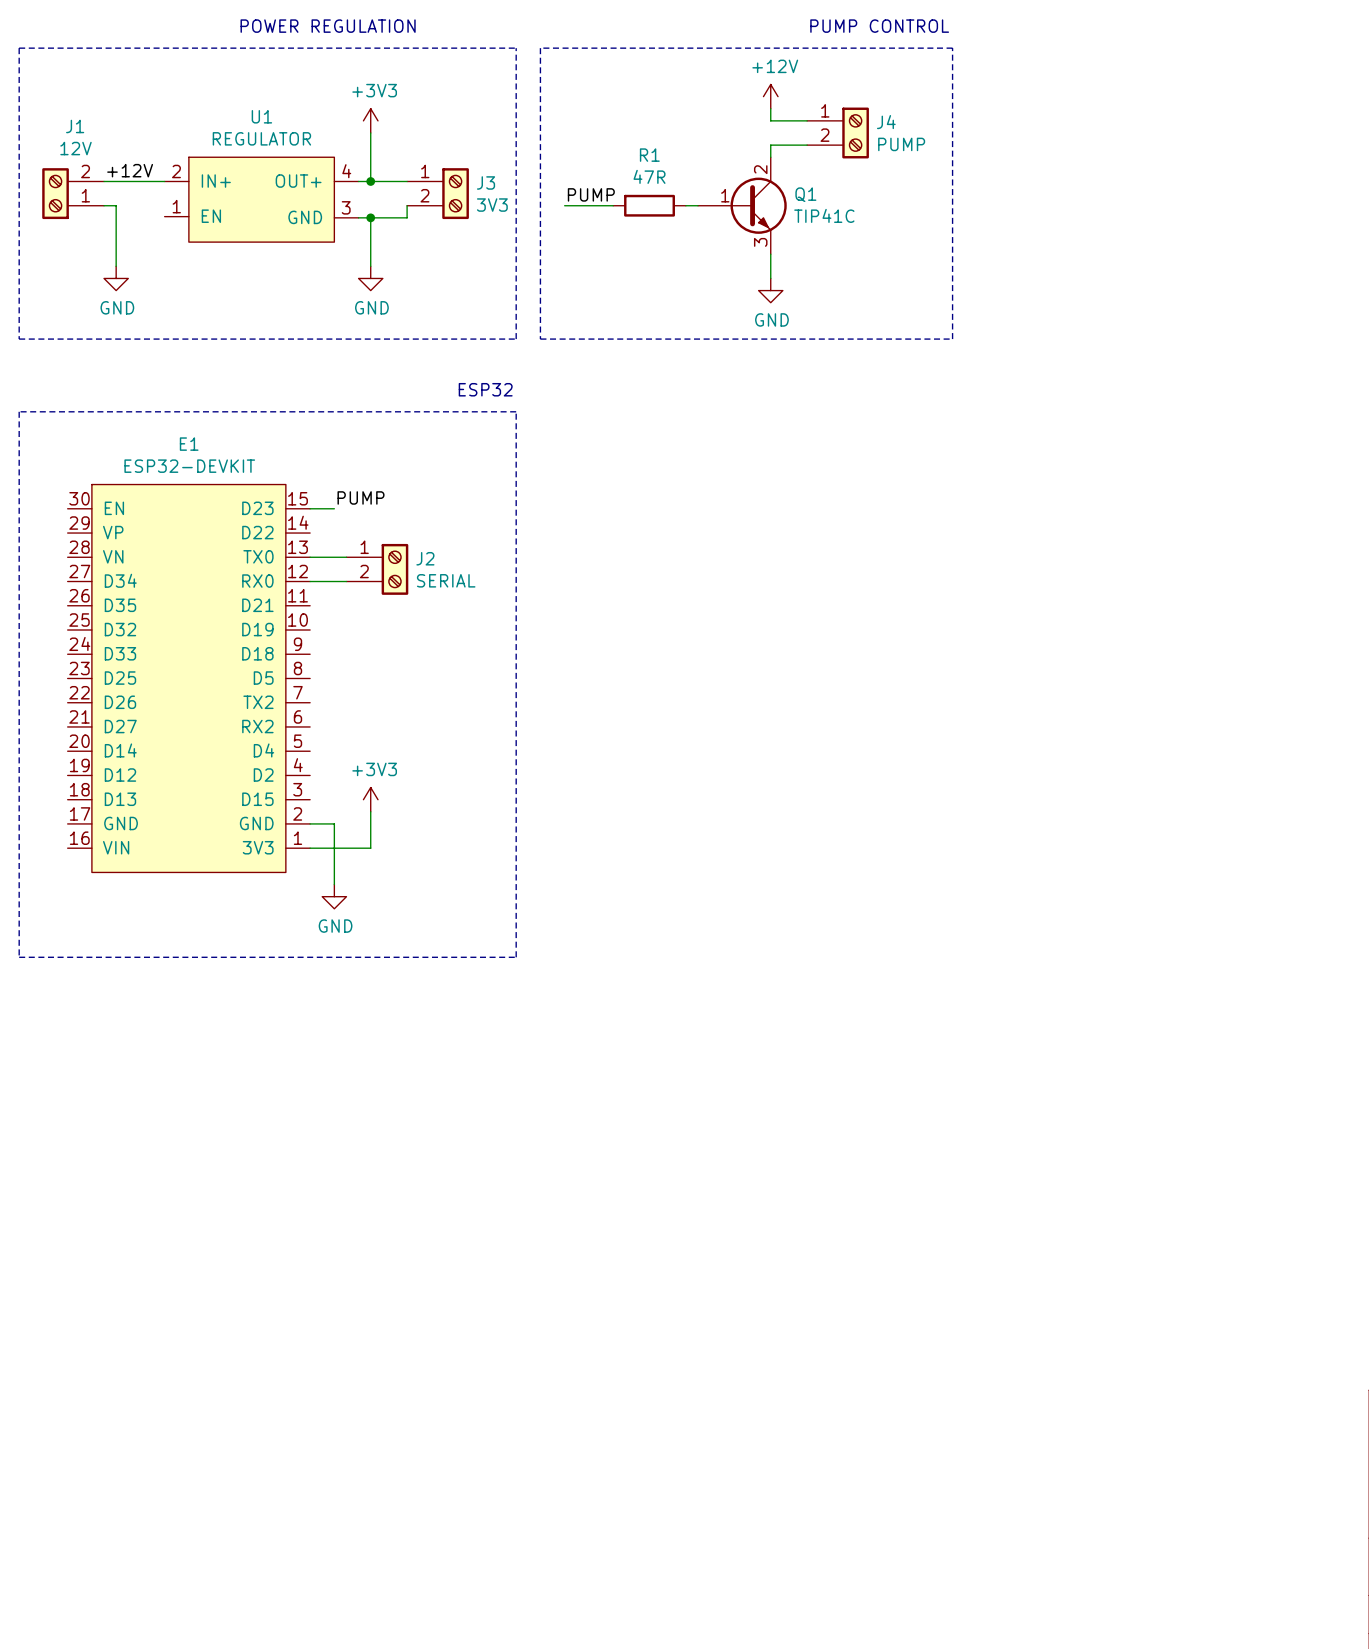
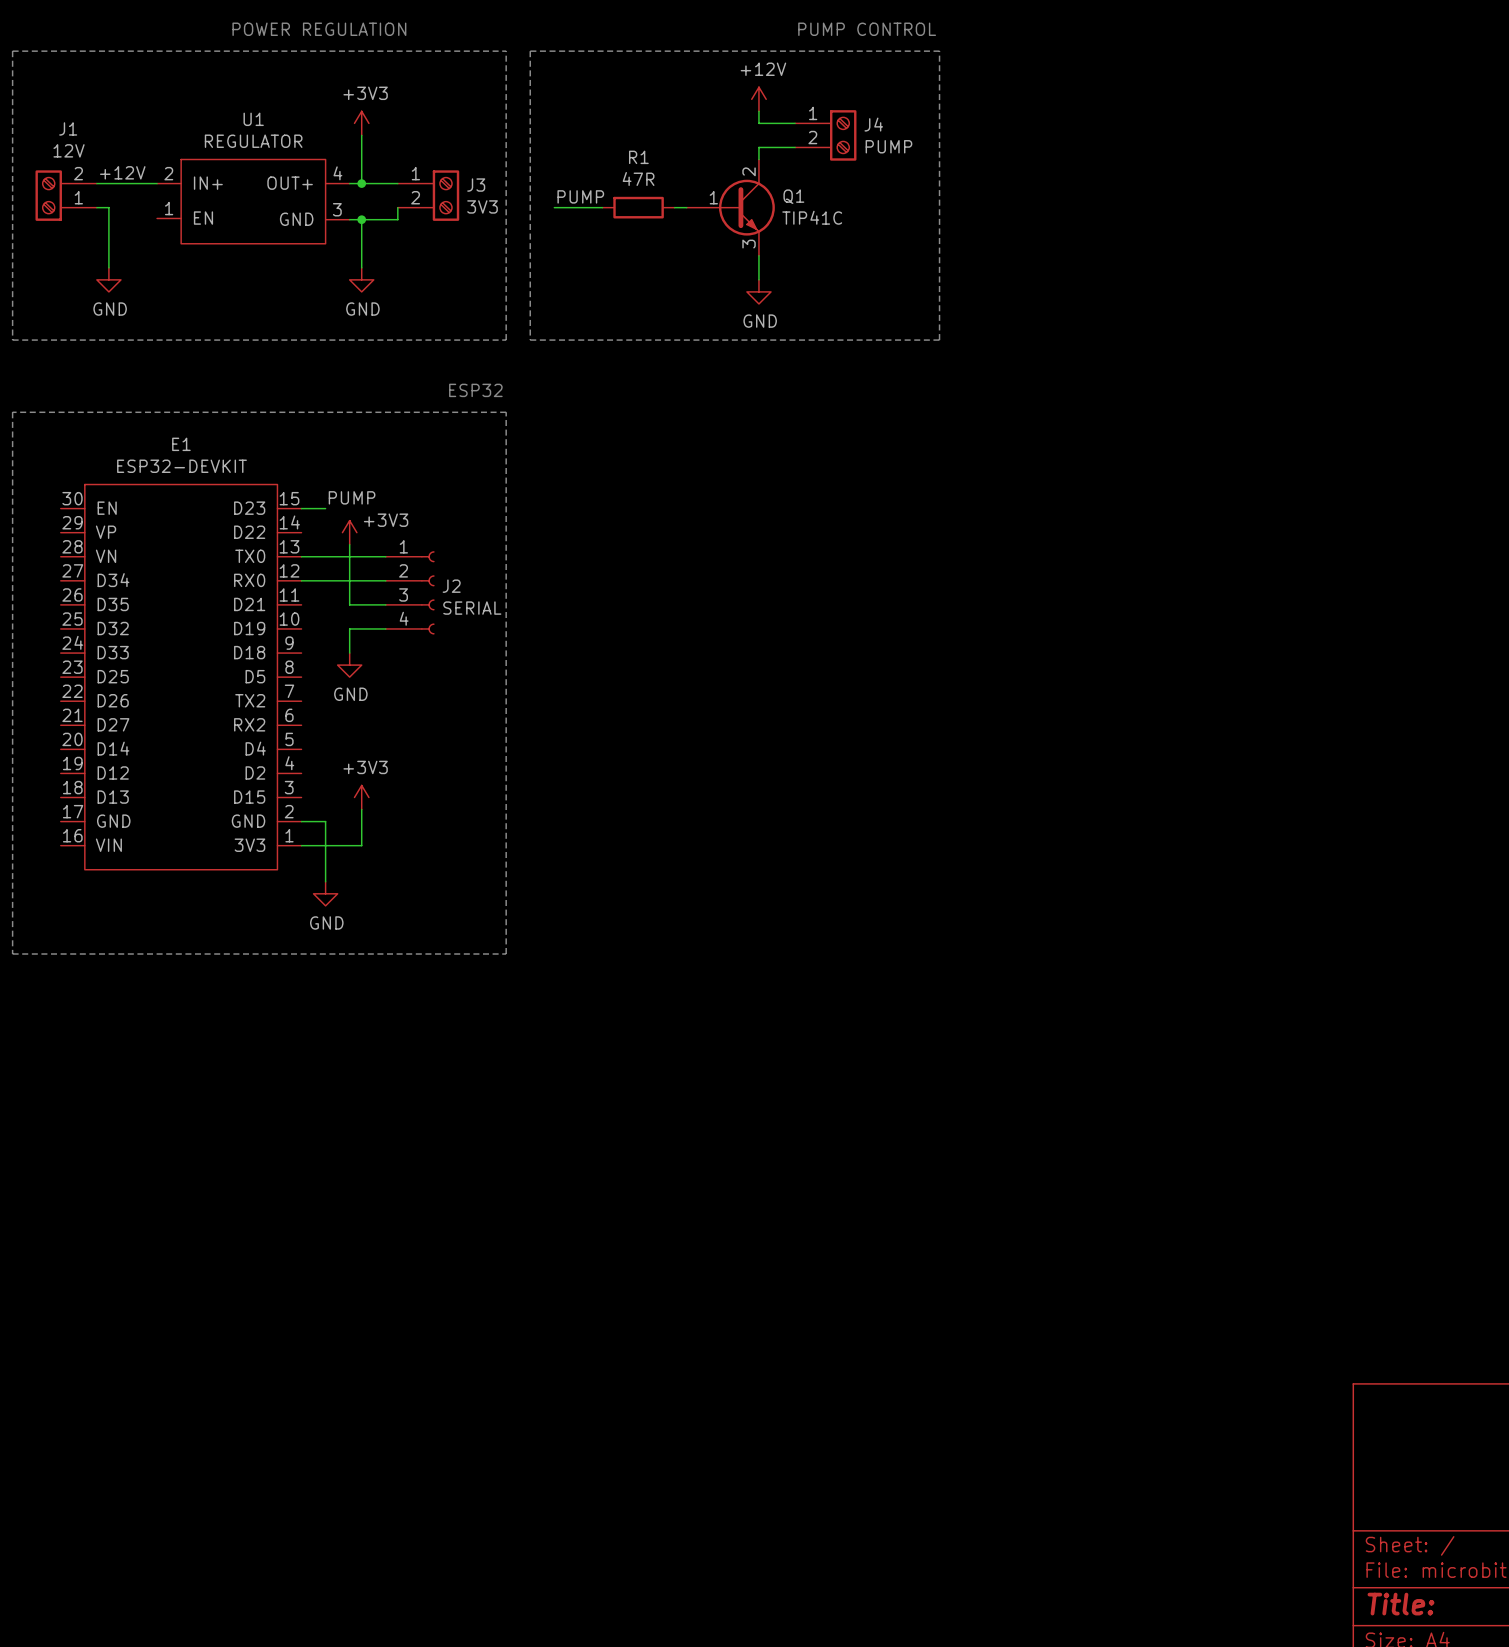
power symbol: none -> +3V3 (349, 532)
J2 symbol: [346, 543, 409, 595] -> [385, 551, 435, 635]
wire: none -> (349, 544) (349, 604) (385, 604)
wire: none -> (385, 628) (349, 628) (349, 653)
power symbol: none -> GND (349, 665)

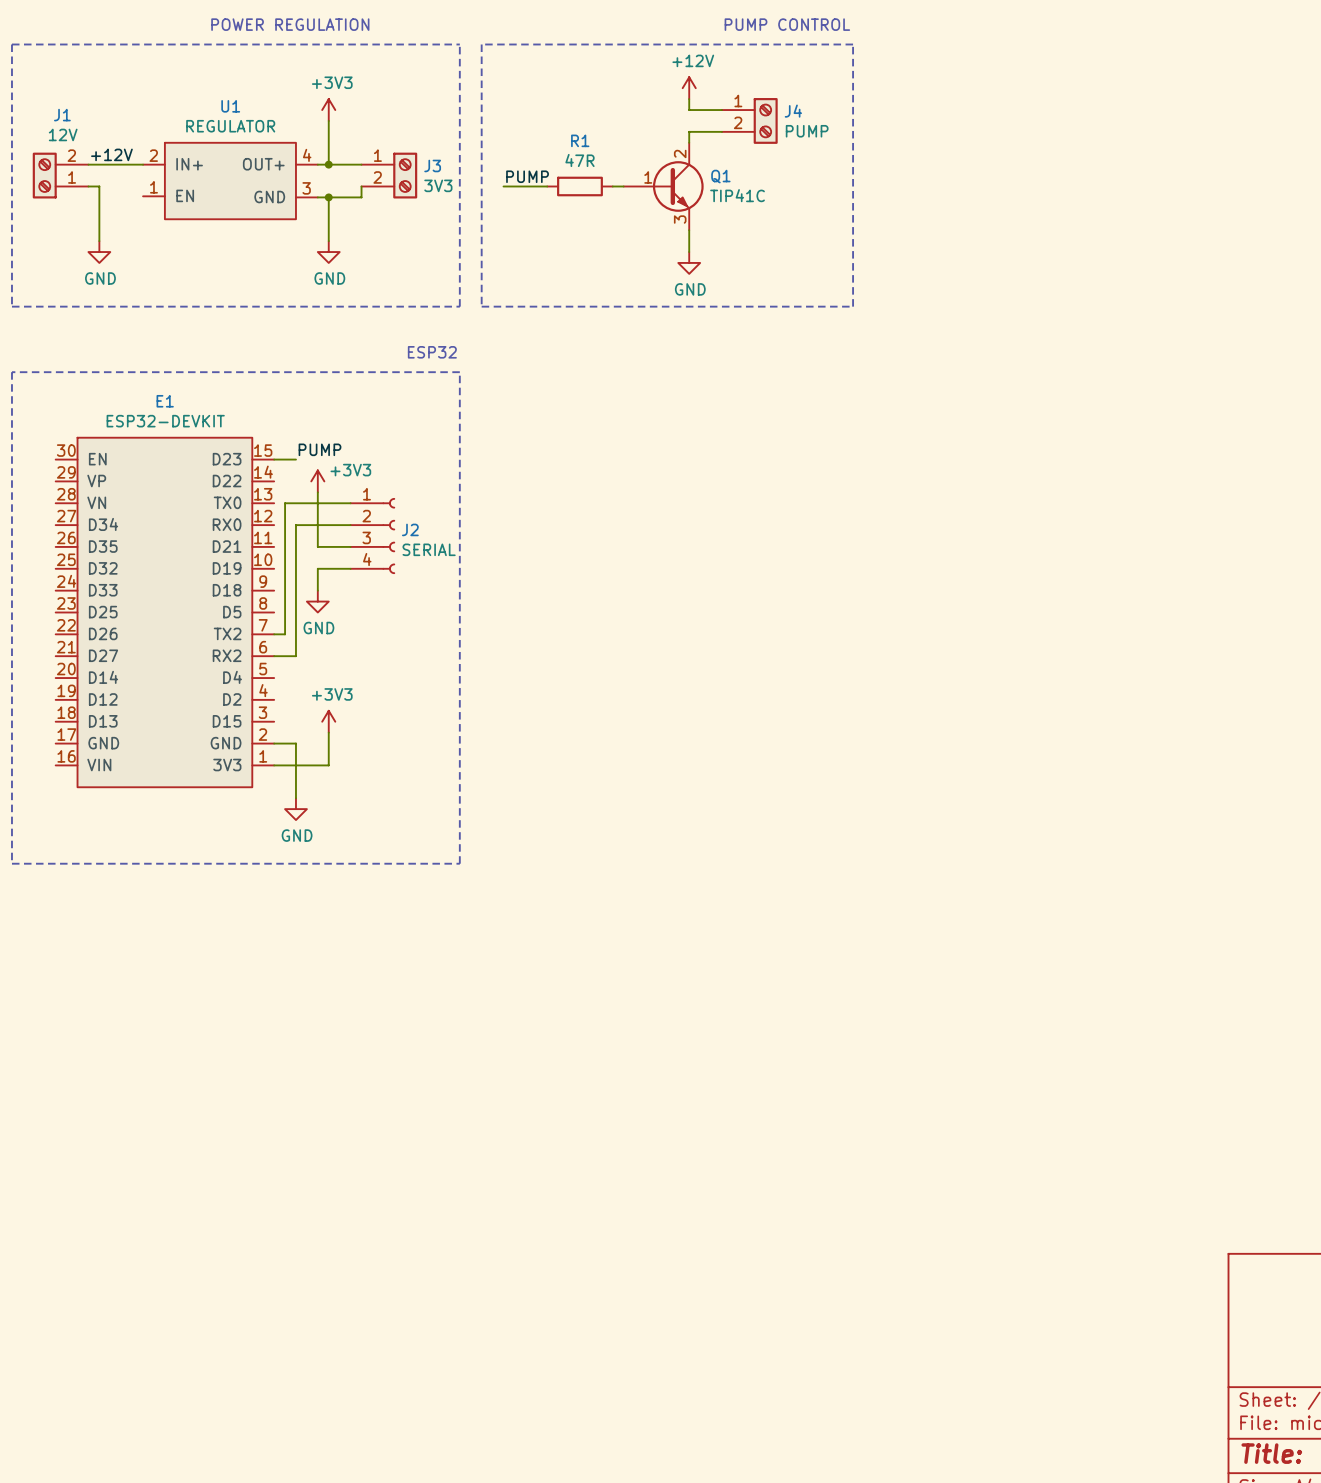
wire: (301, 556) (313, 556) -> (274, 634) (285, 634) (285, 503)
wire: (301, 580) (325, 580) -> (274, 656) (295, 656) (295, 525)

